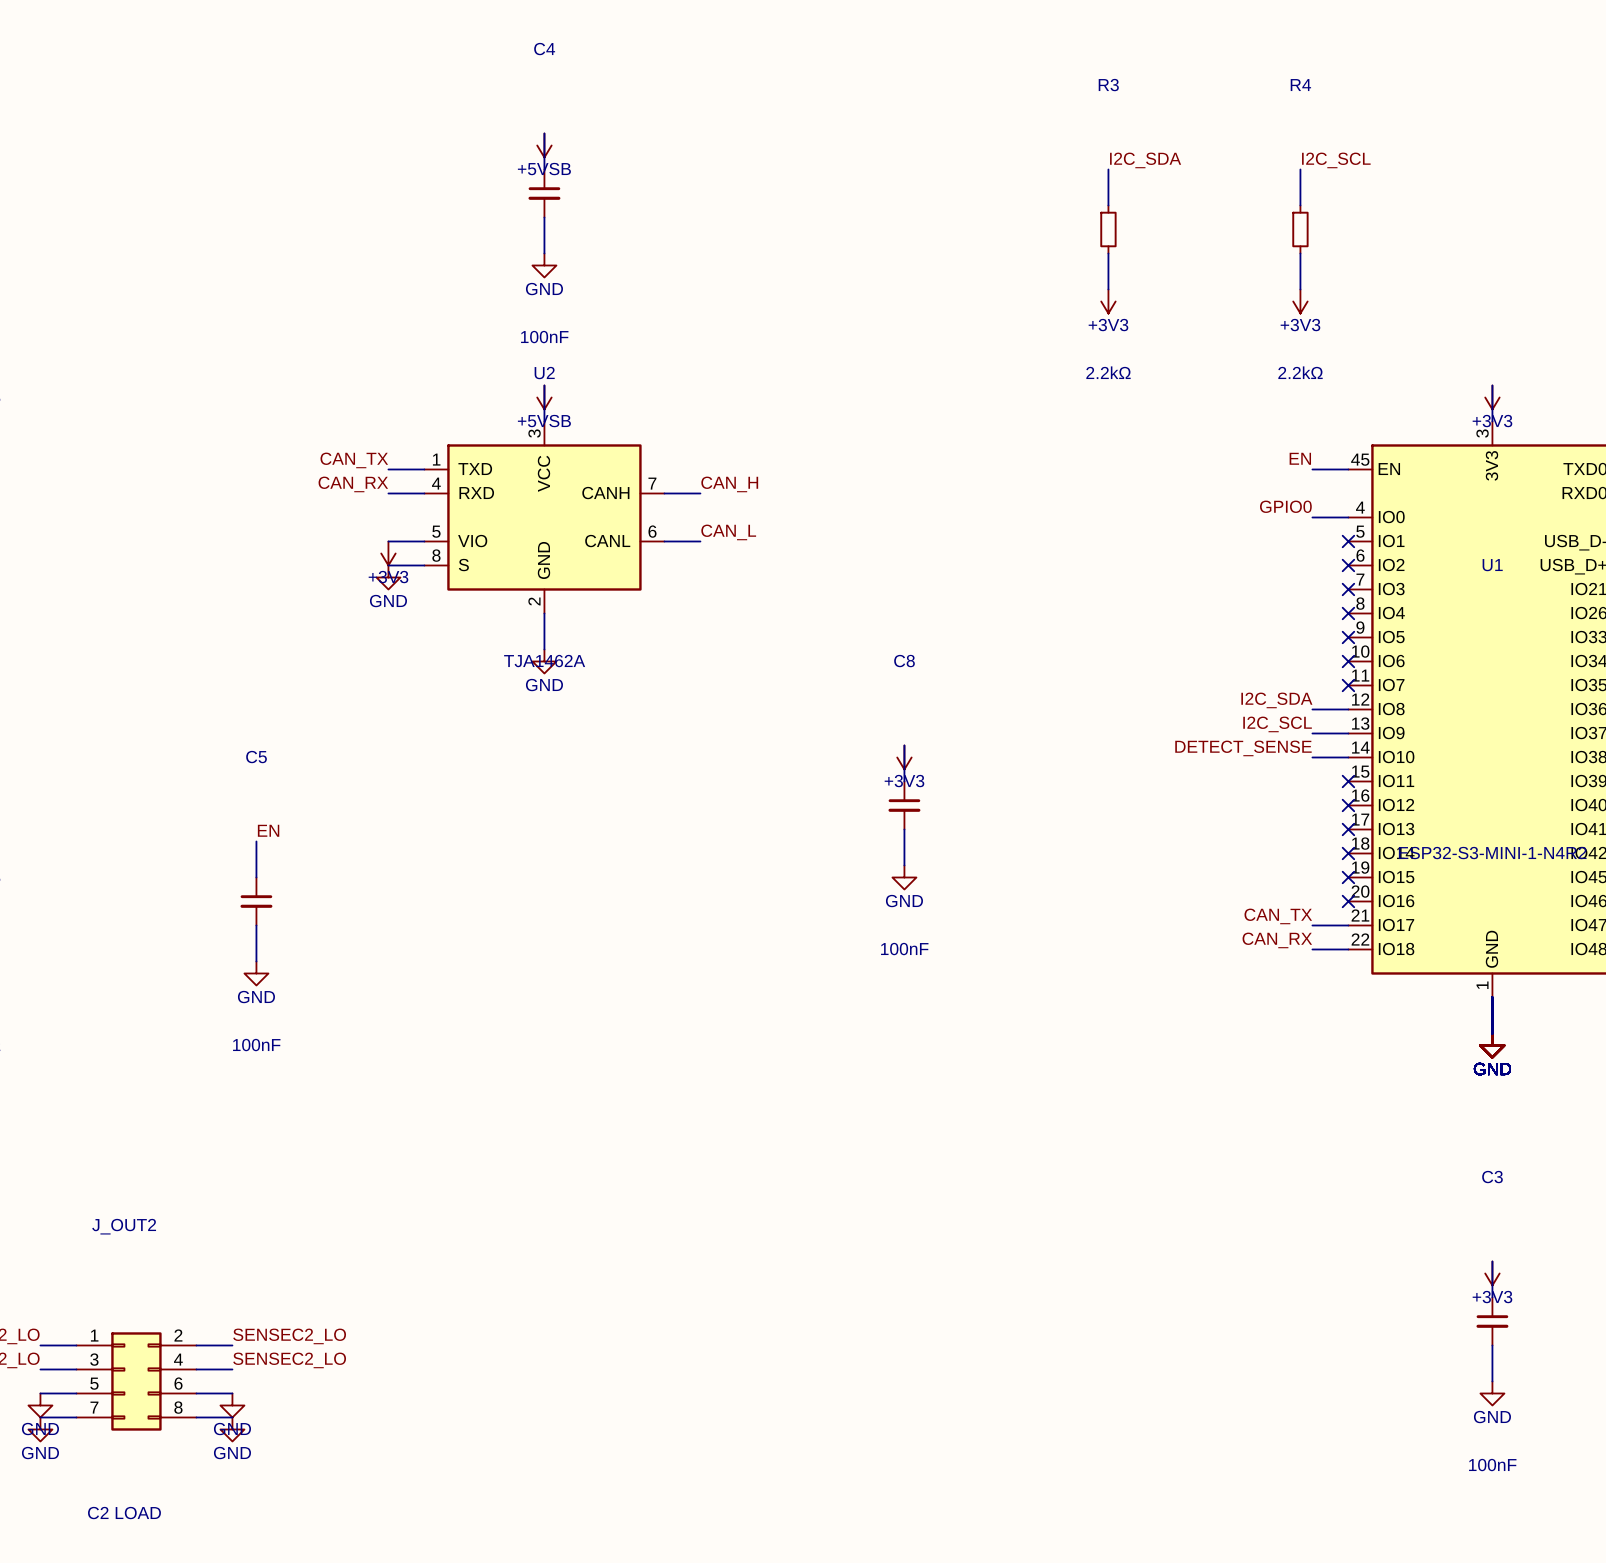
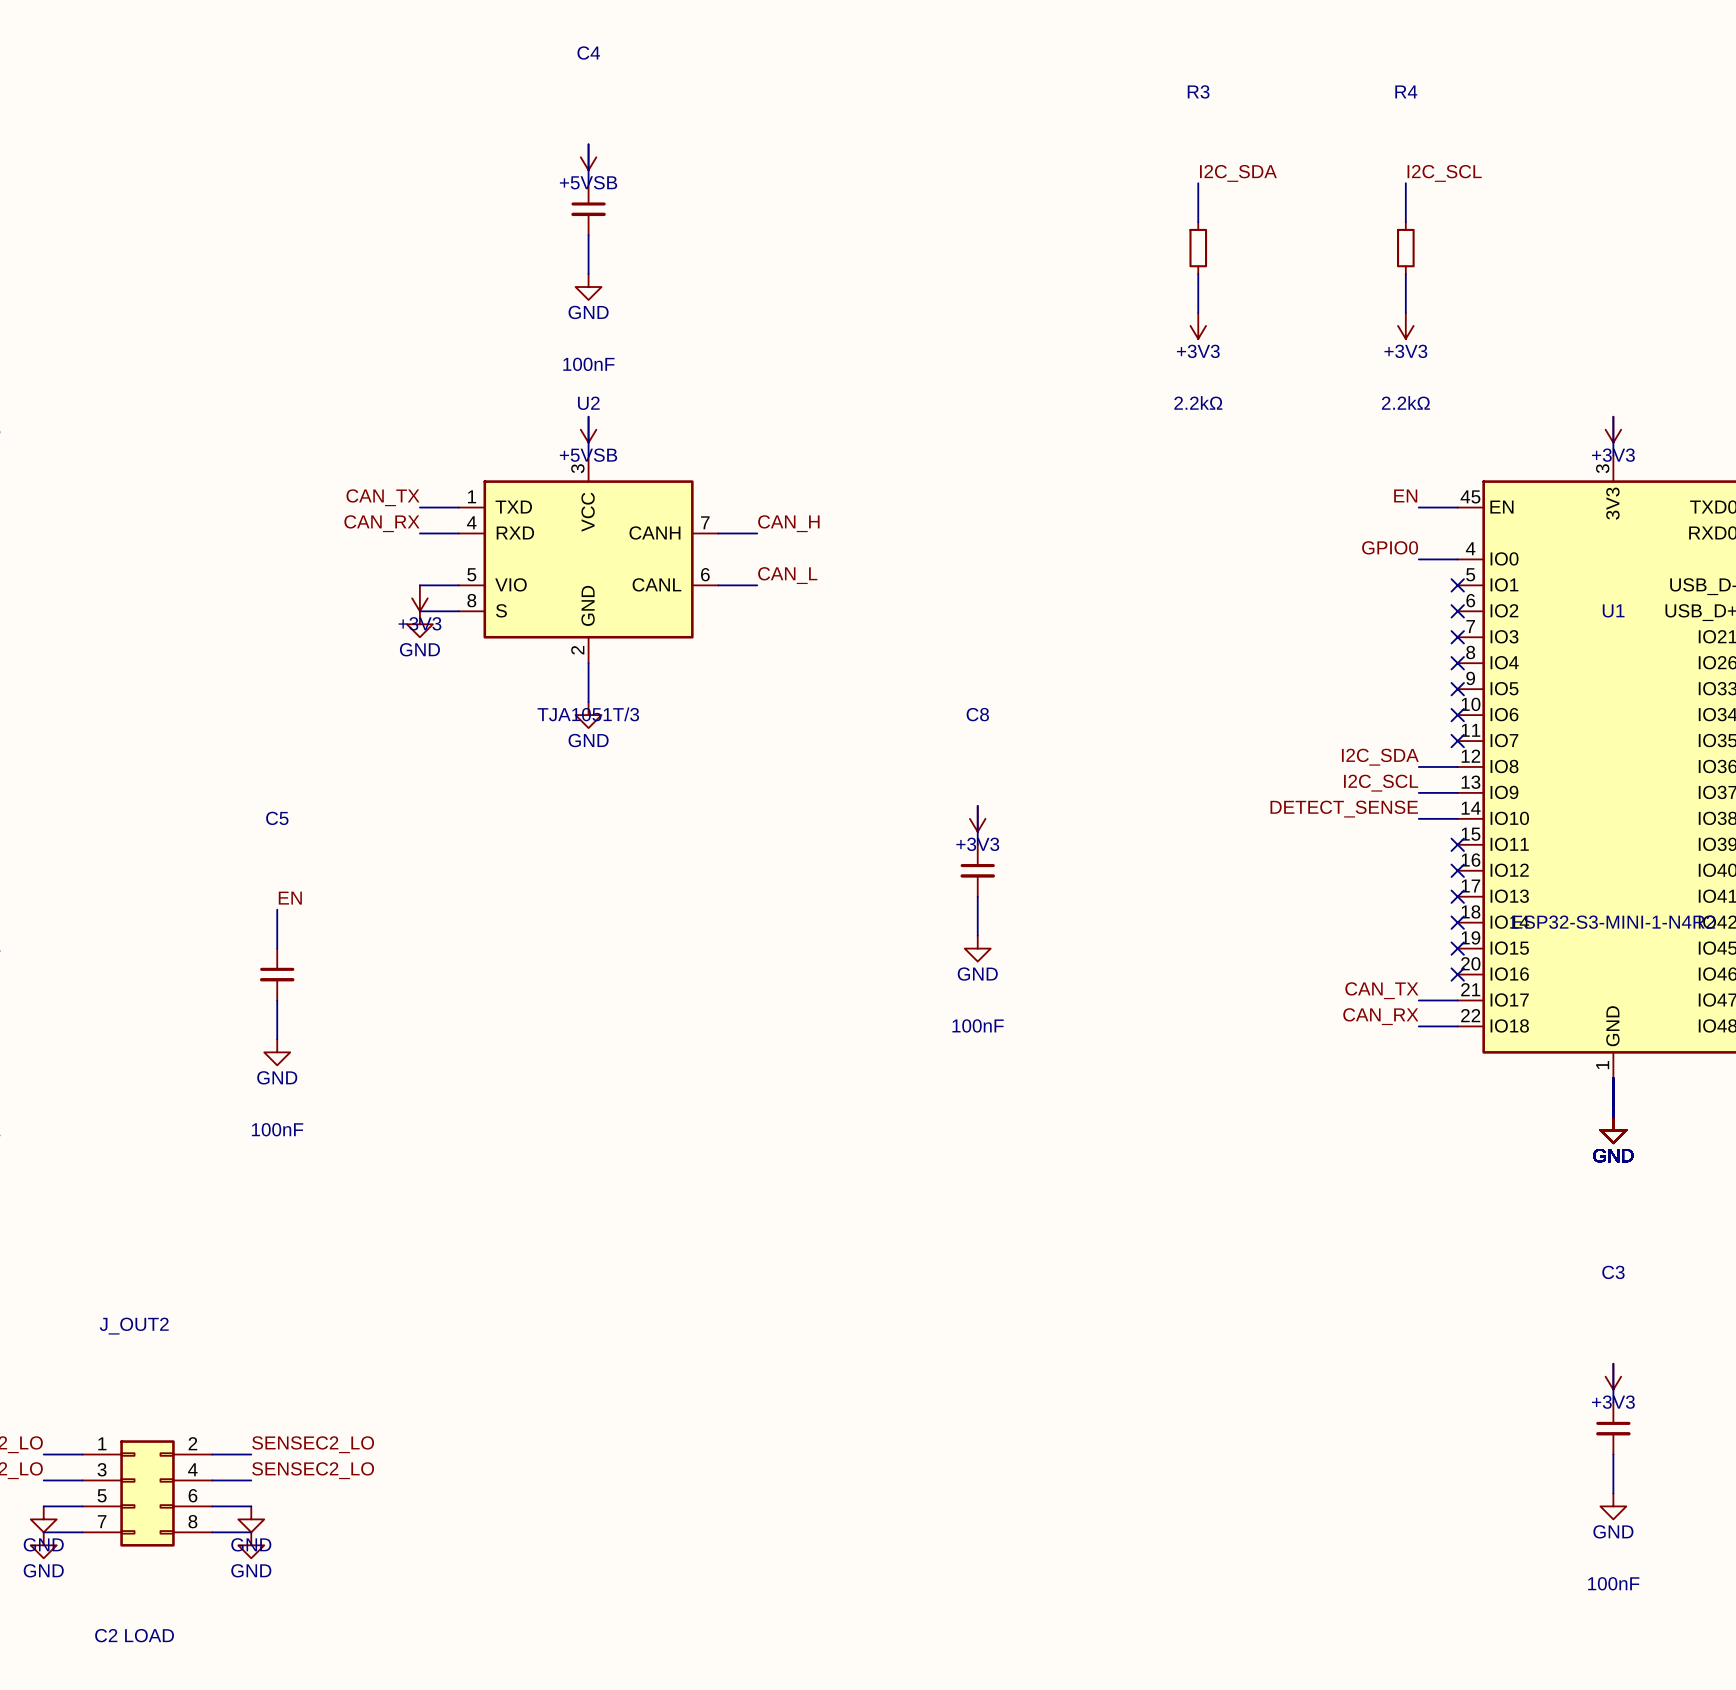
U2 value: TJA1462A (544, 661) -> TJA1051T/3 (588, 714)

